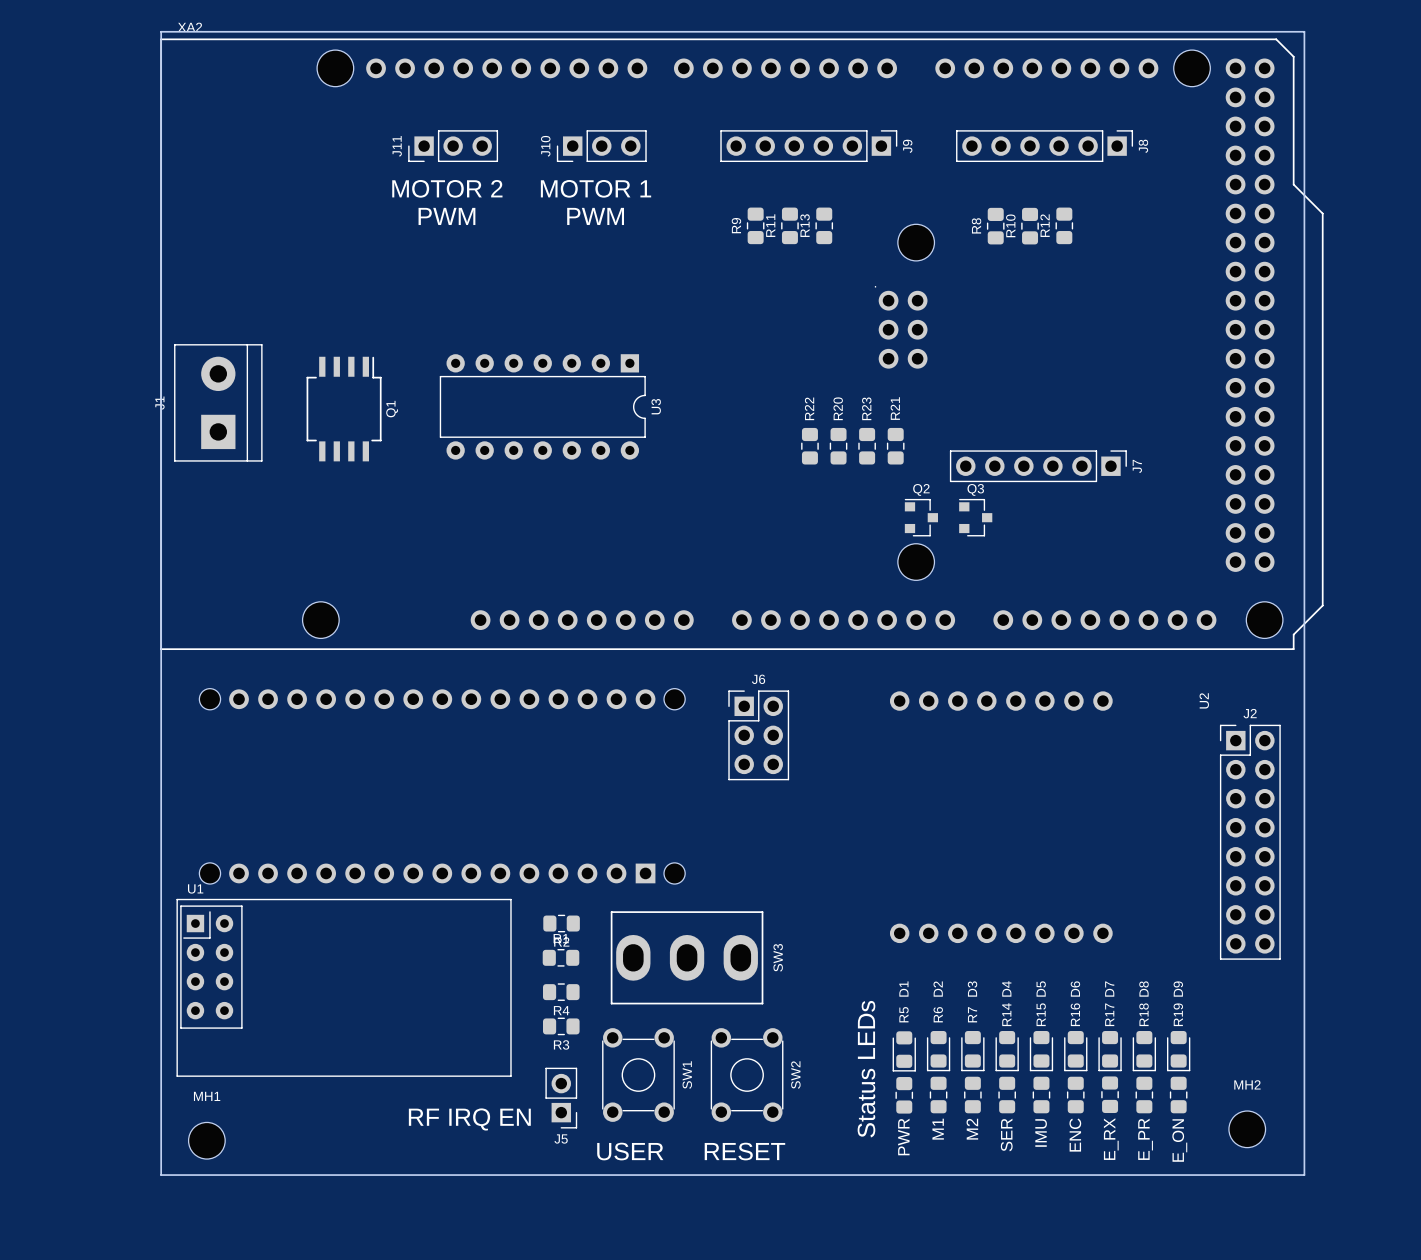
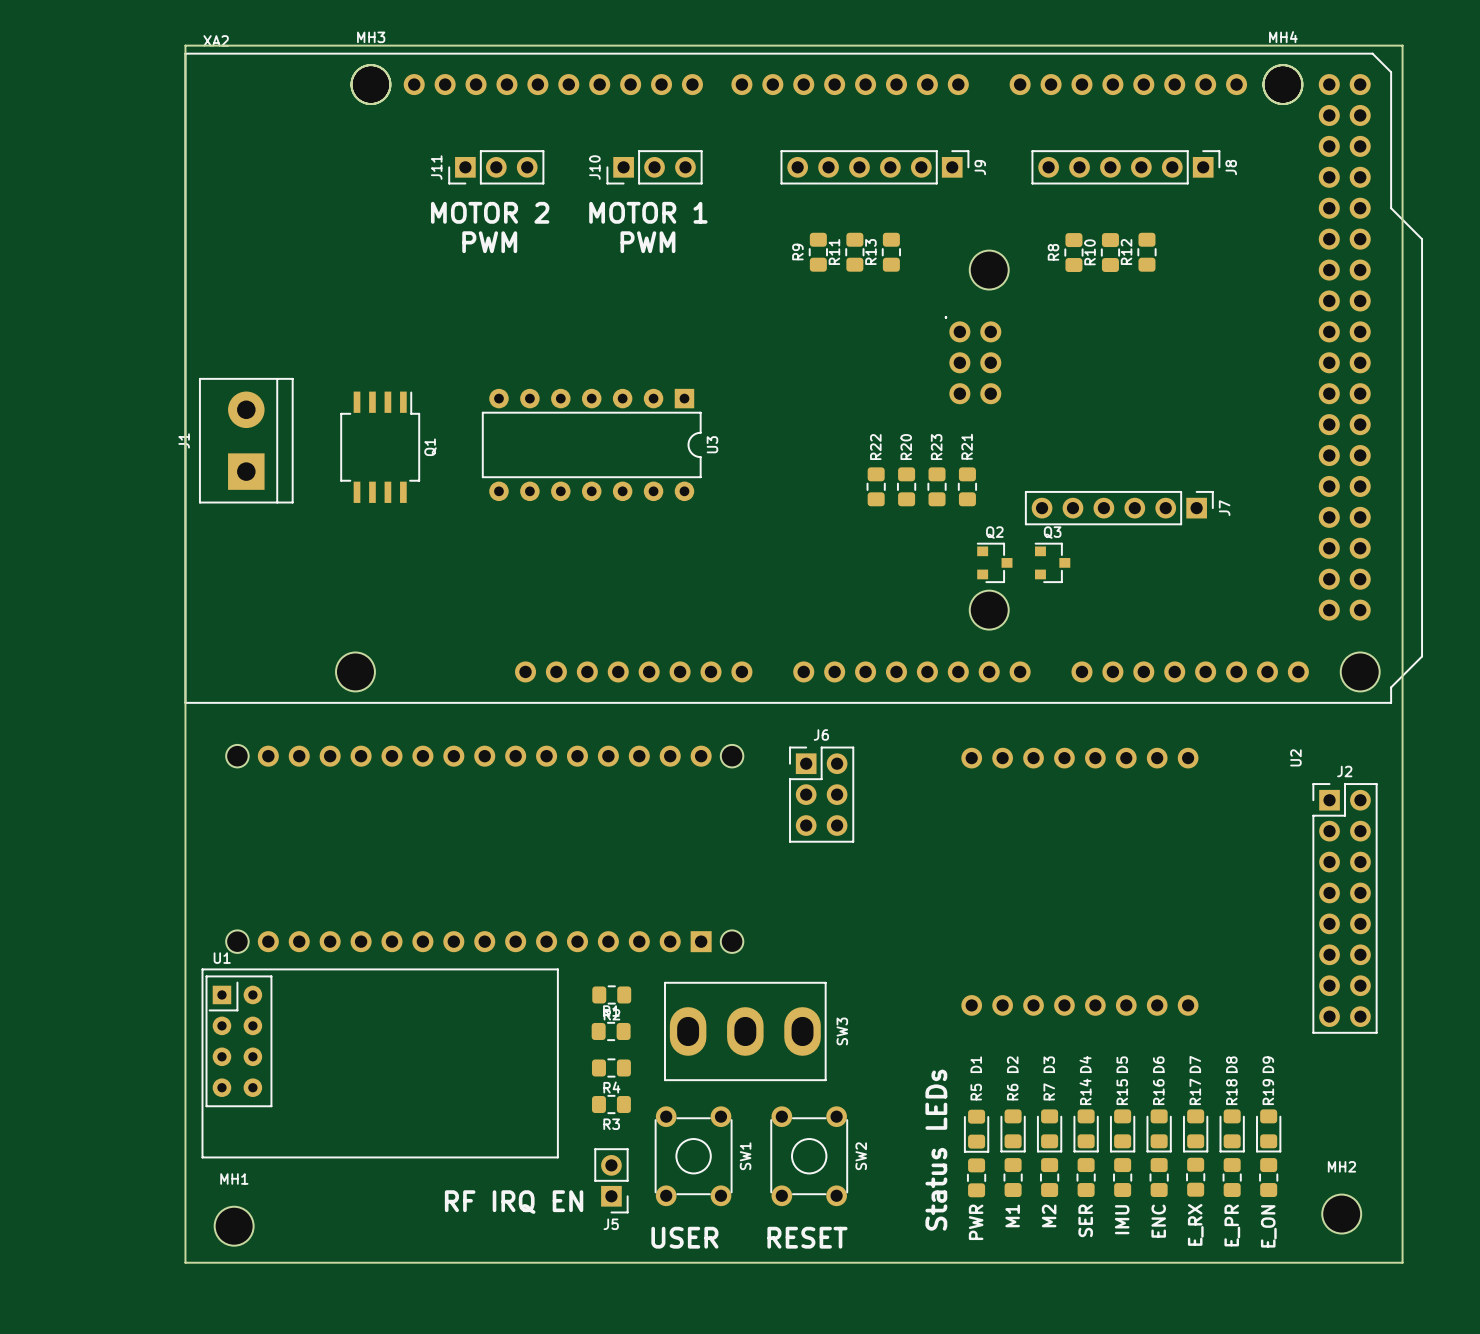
MH3: none -> (370, 84)
MH4: none -> (1282, 84)

